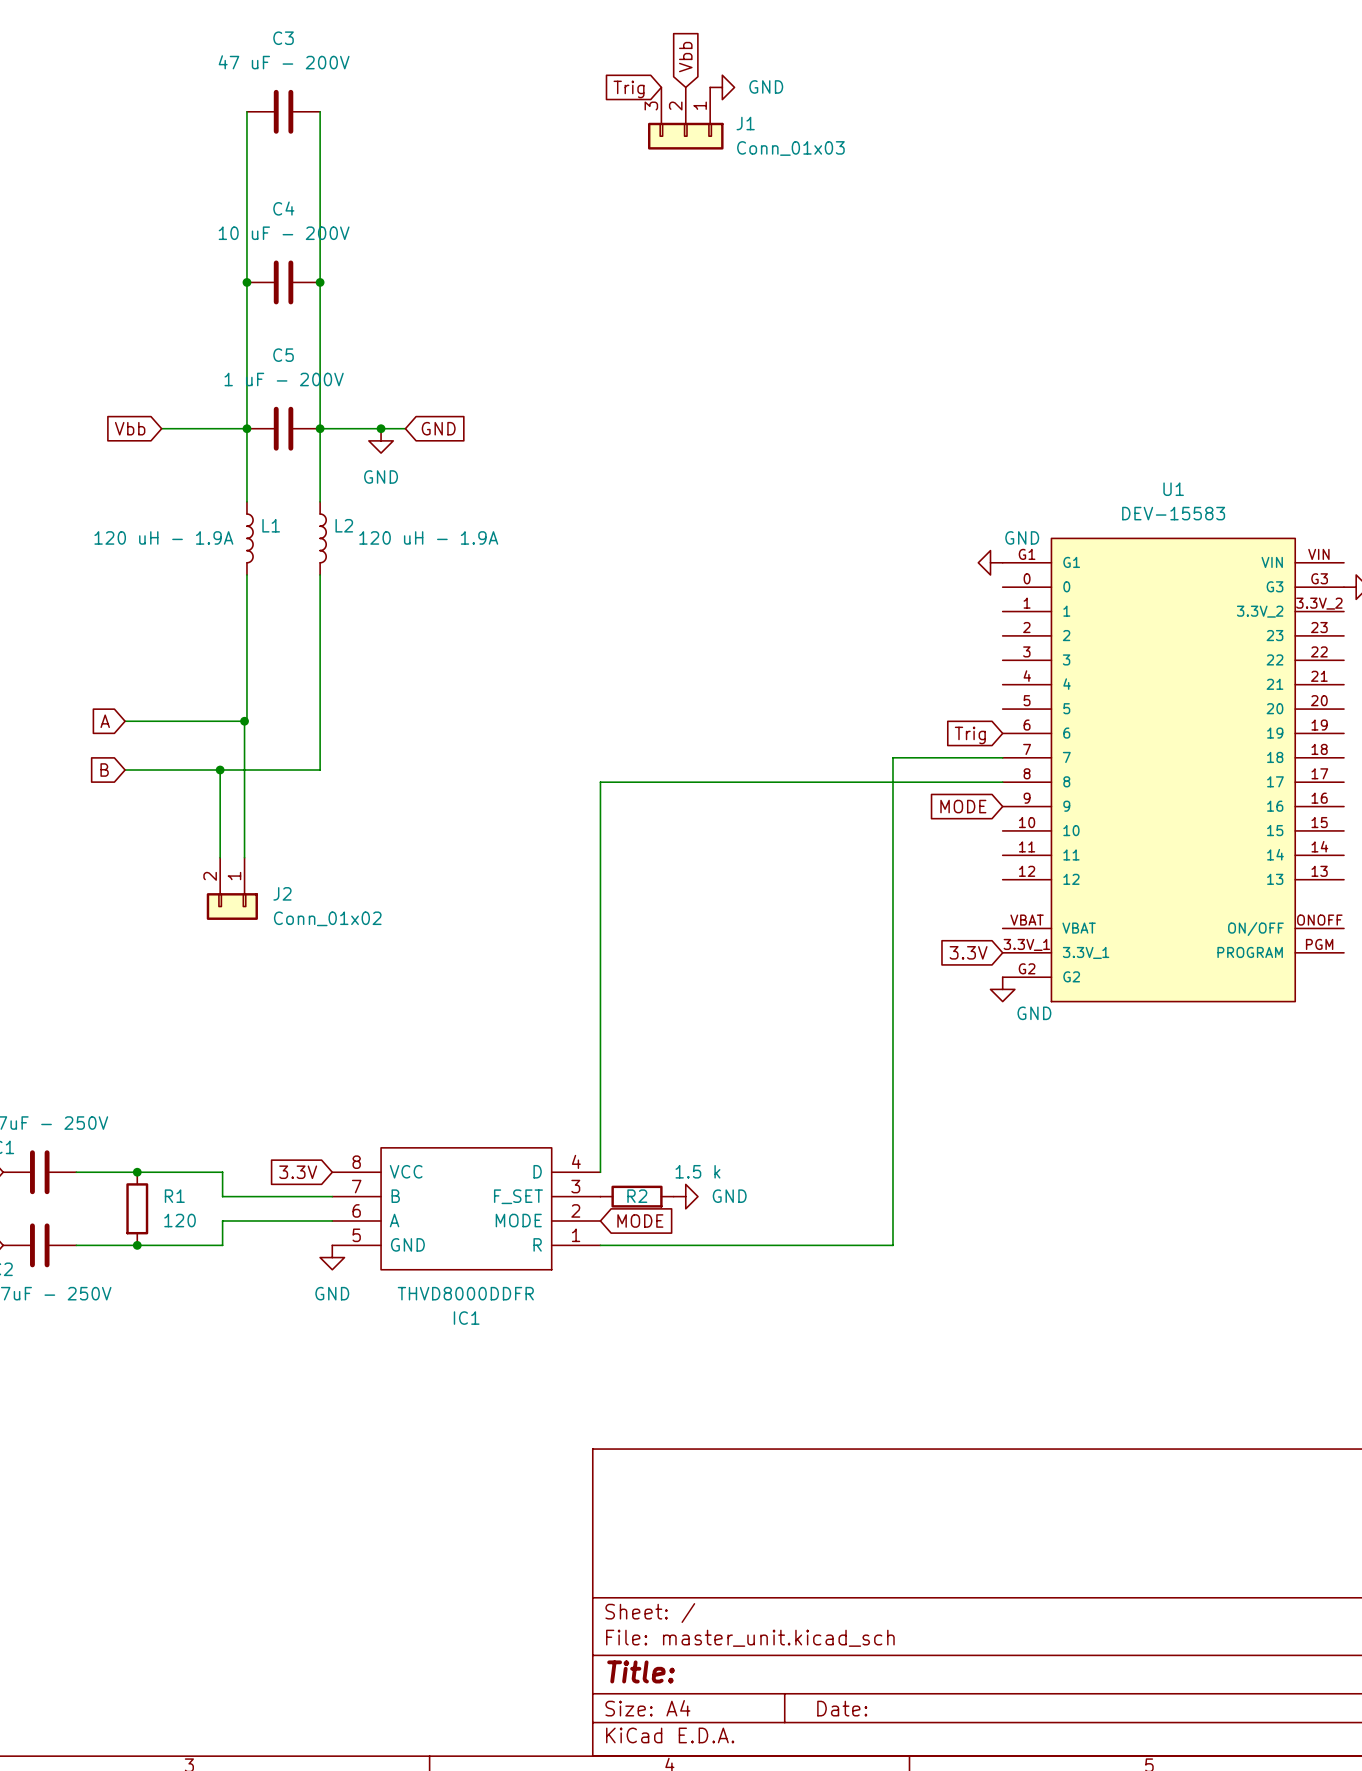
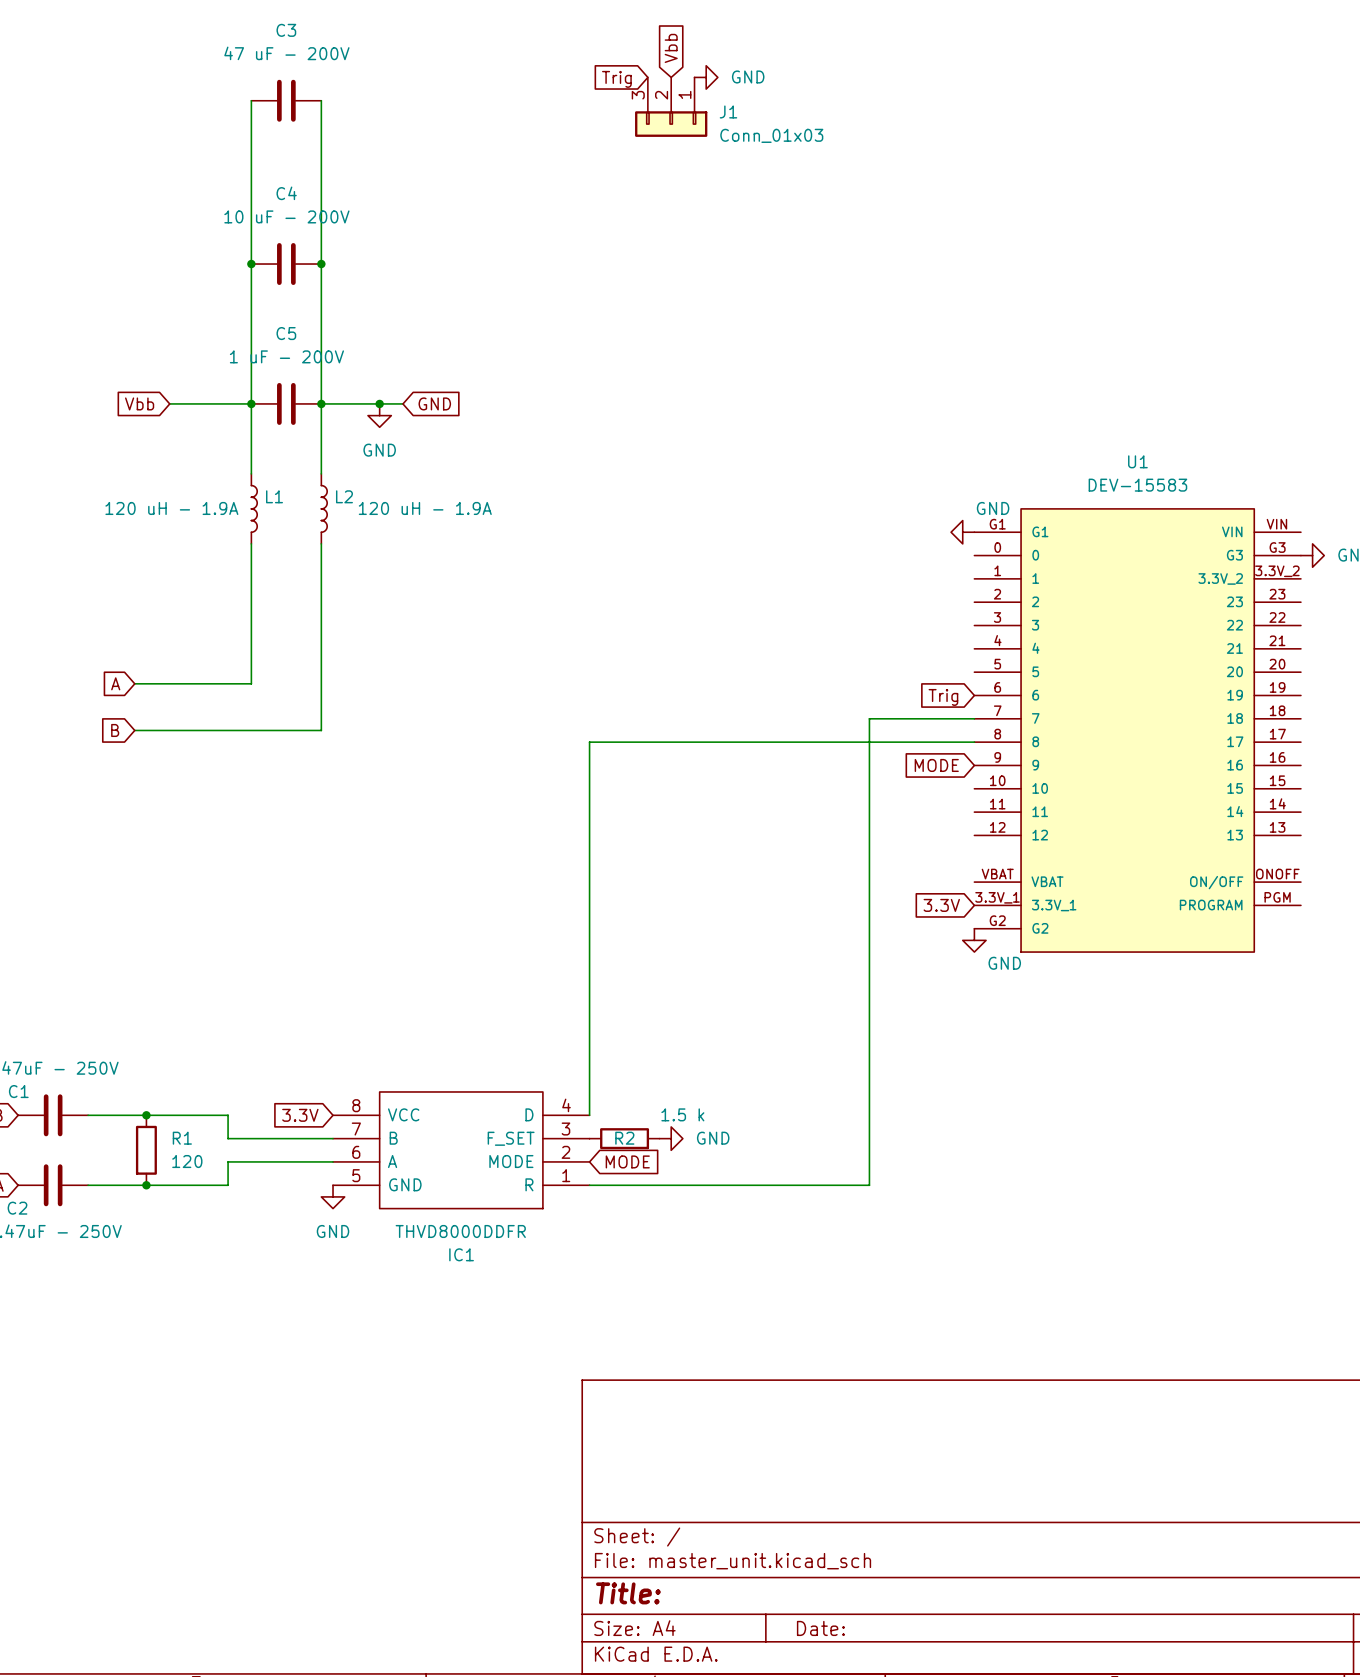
wire: (244, 721) (244, 857) -> none
junction: (244, 721) -> none
wire: (220, 770) (220, 857) -> none
junction: (220, 770) -> none
J2: Conn_01x02 (232, 888) -> none

